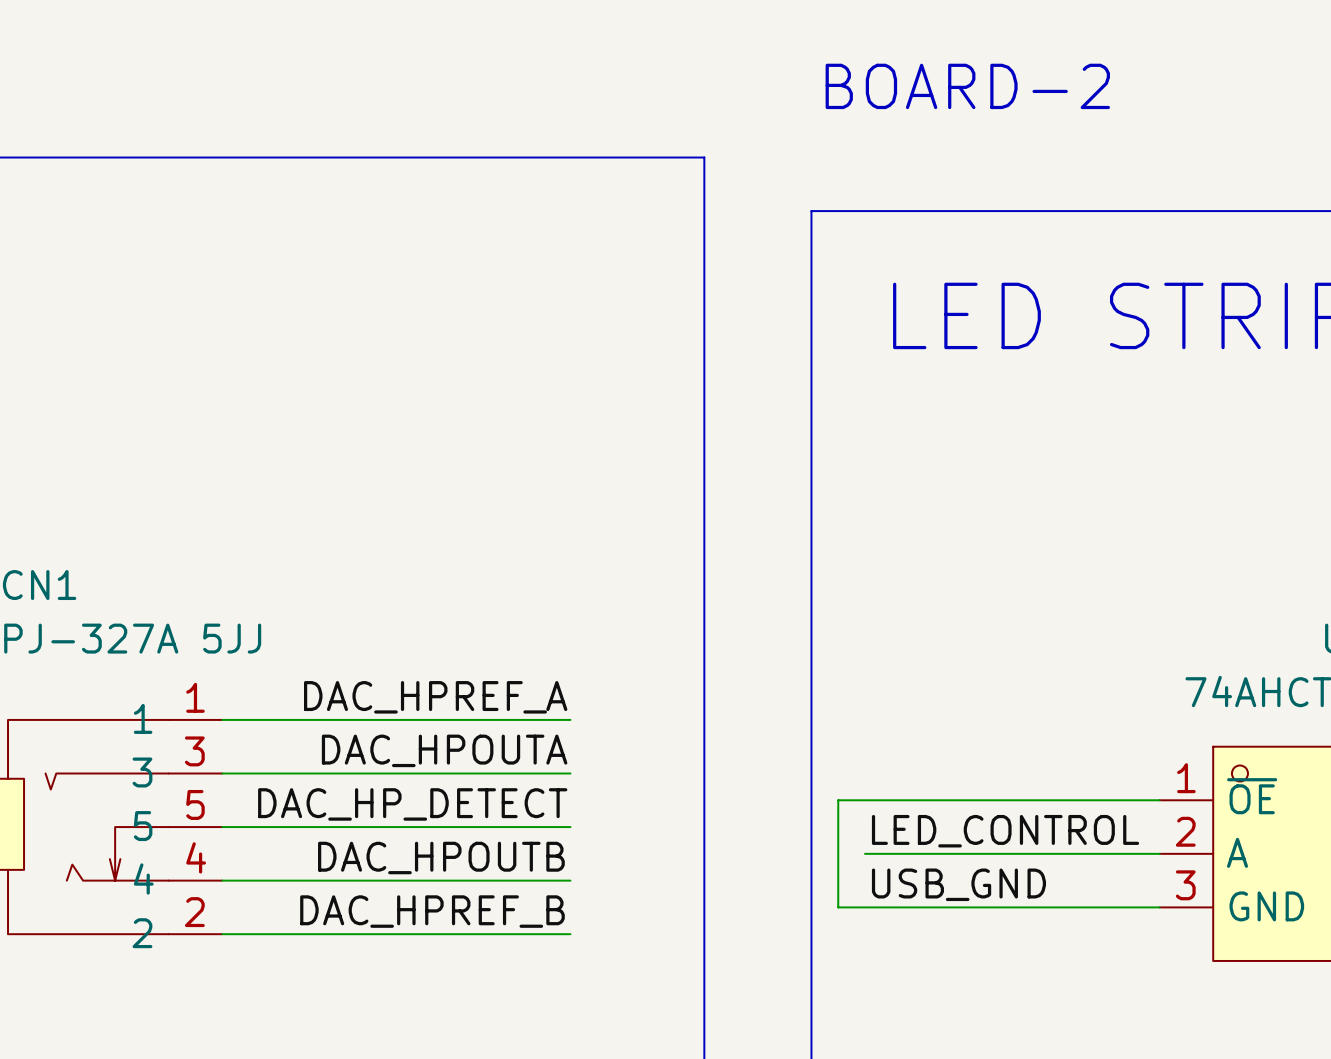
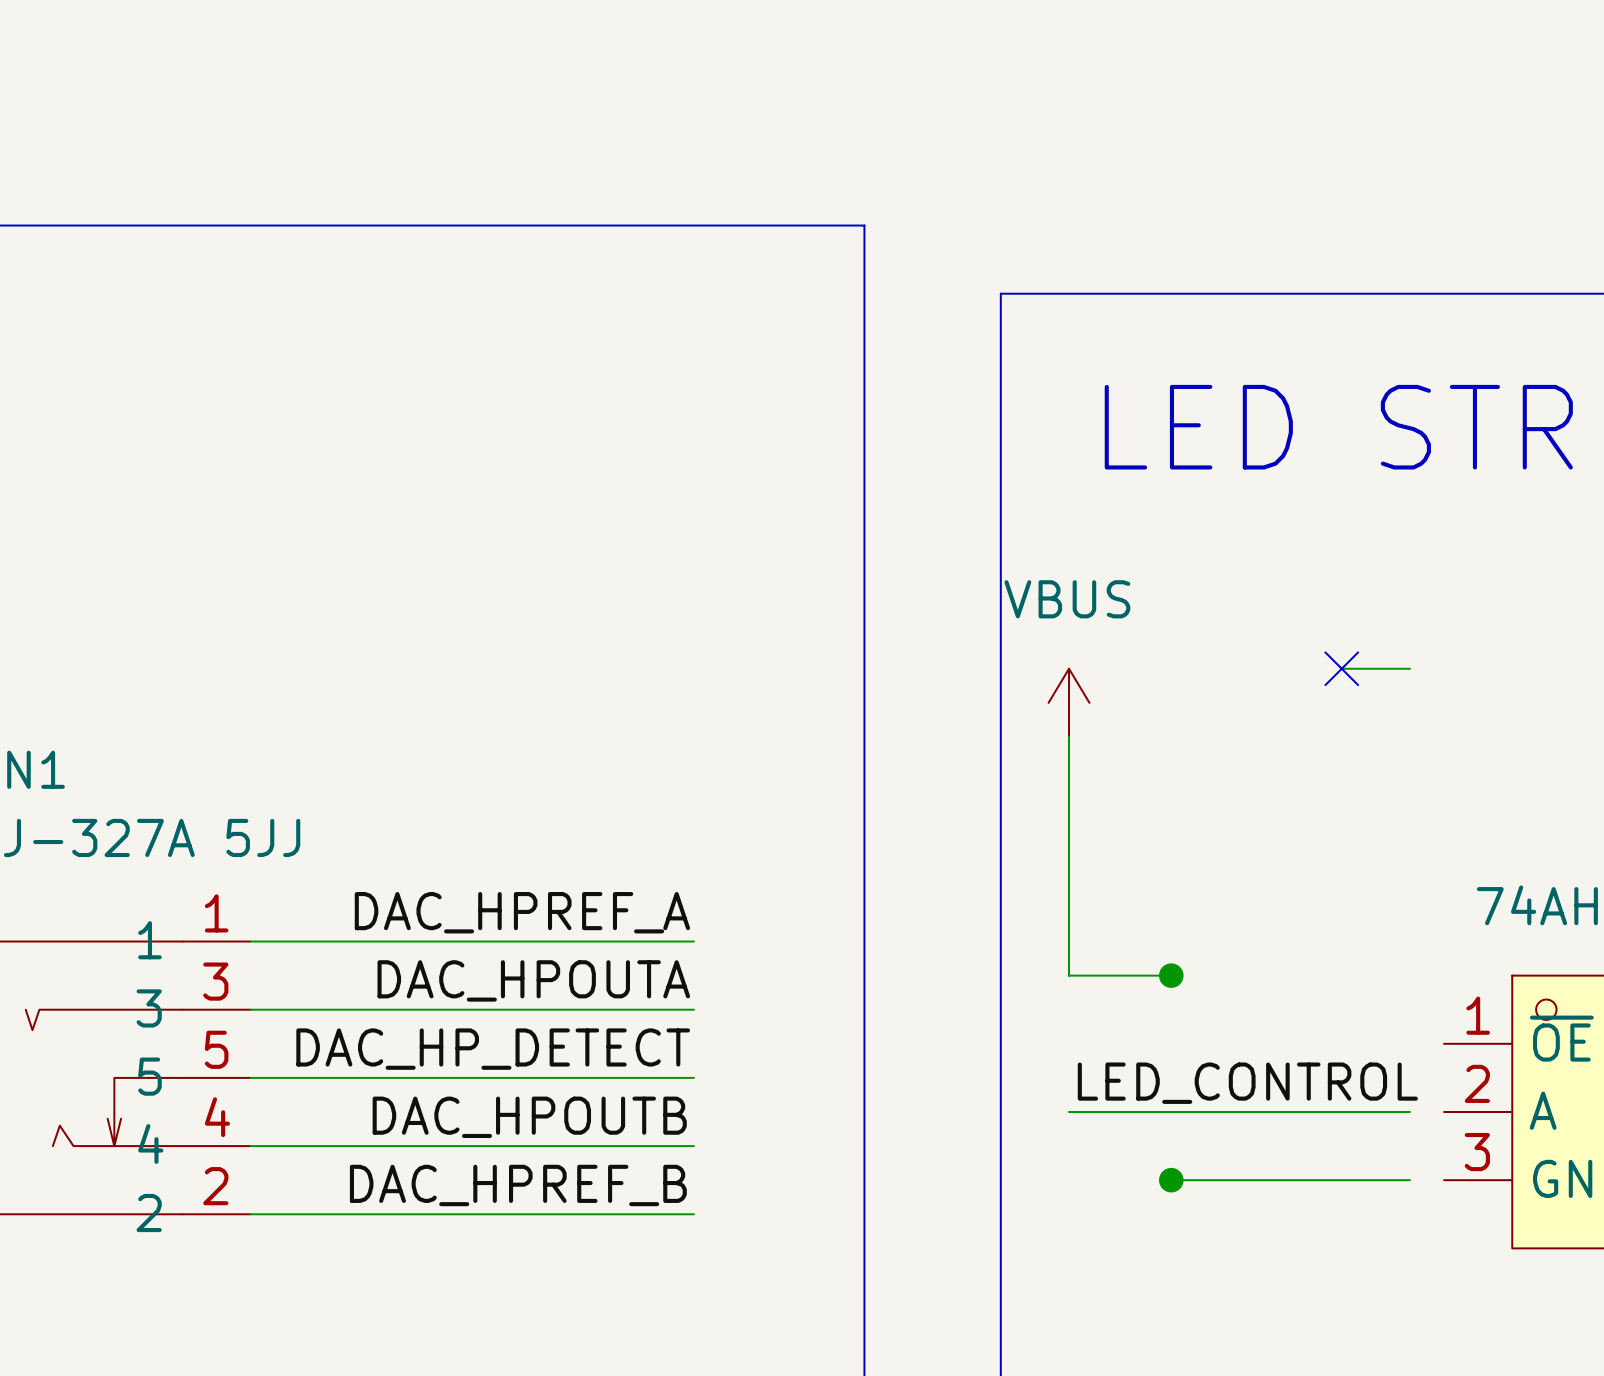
text: BOARD-2 (967, 86) -> none
wire: none -> (1341, 668) (1409, 668)
no-connect mark: none -> (1341, 668)
power symbol: none -> VBUS (1069, 702)
wire: none -> (1069, 736) (1069, 975) (1171, 975)
junction: none -> (1171, 975)
wire: (1159, 800) (838, 800) (838, 907) (945, 907) -> none
wire: (1132, 853) (1159, 853) -> none
label: USB_GND (958, 884) -> none
junction: none -> (1171, 1180)
wire: (1132, 907) (1159, 907) -> none

